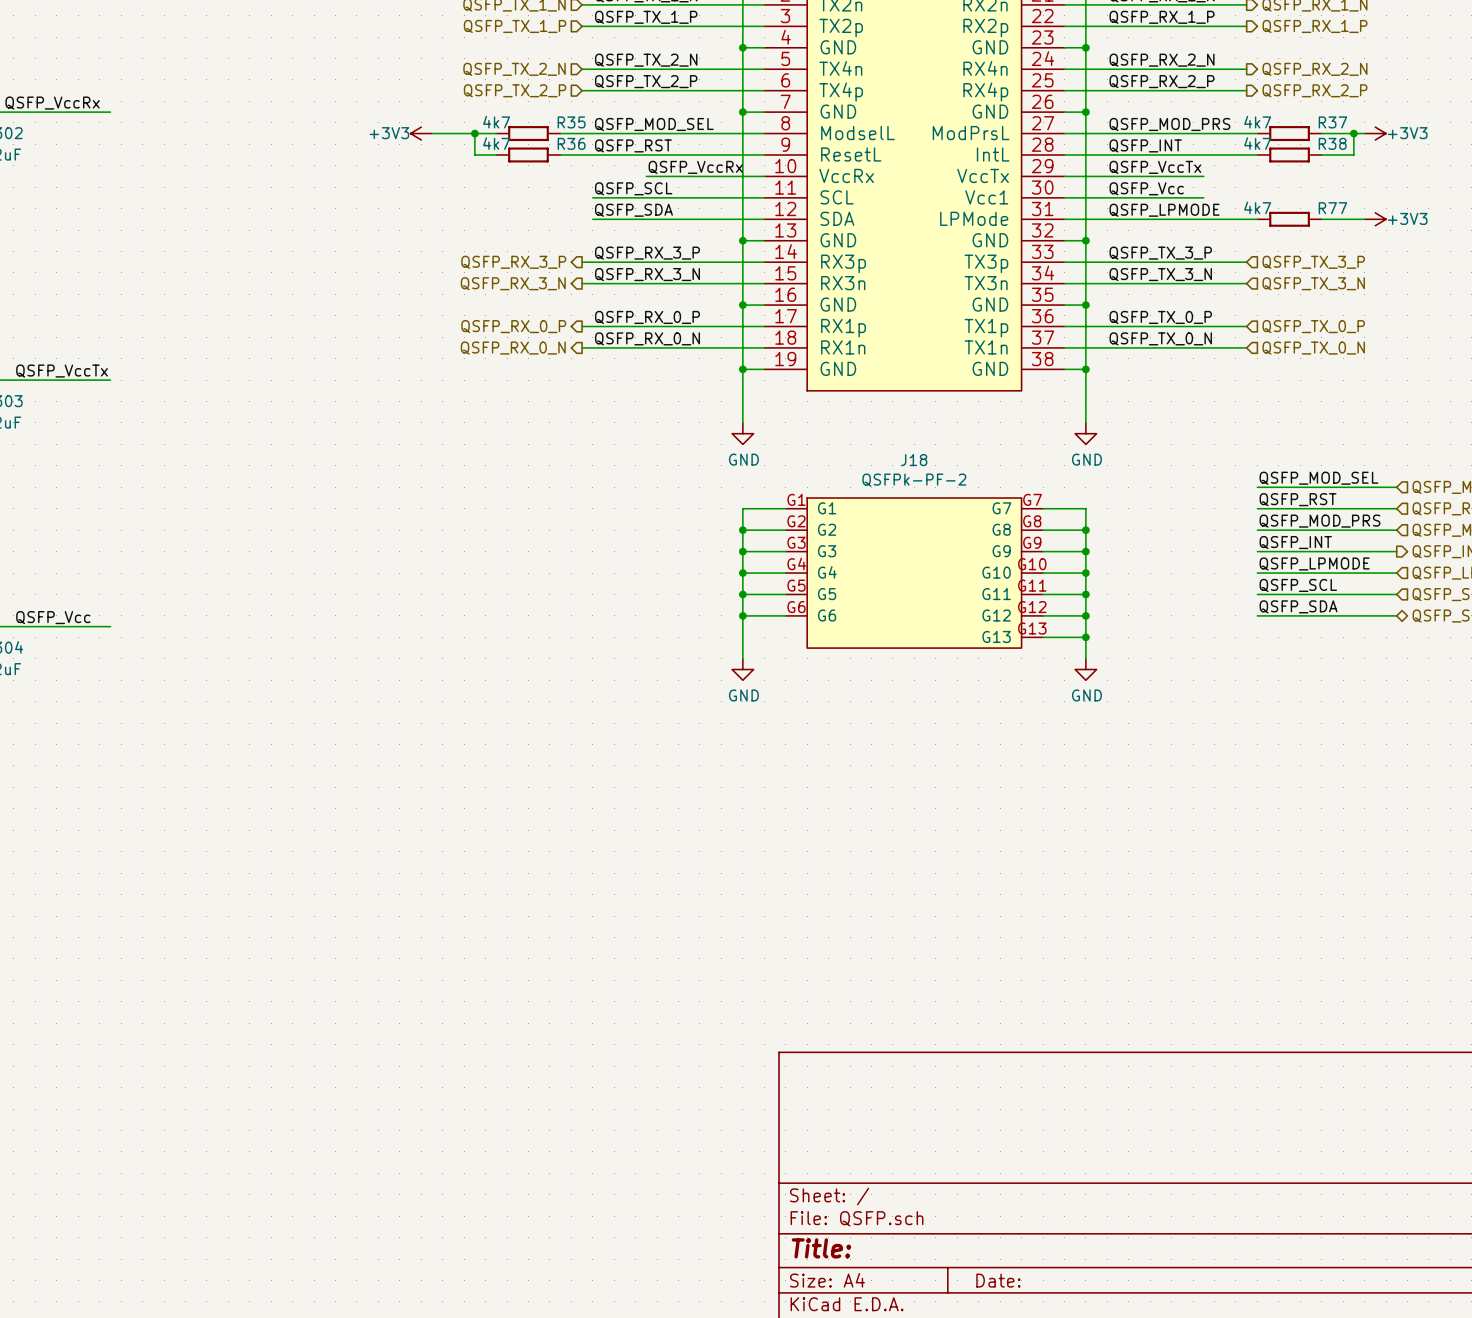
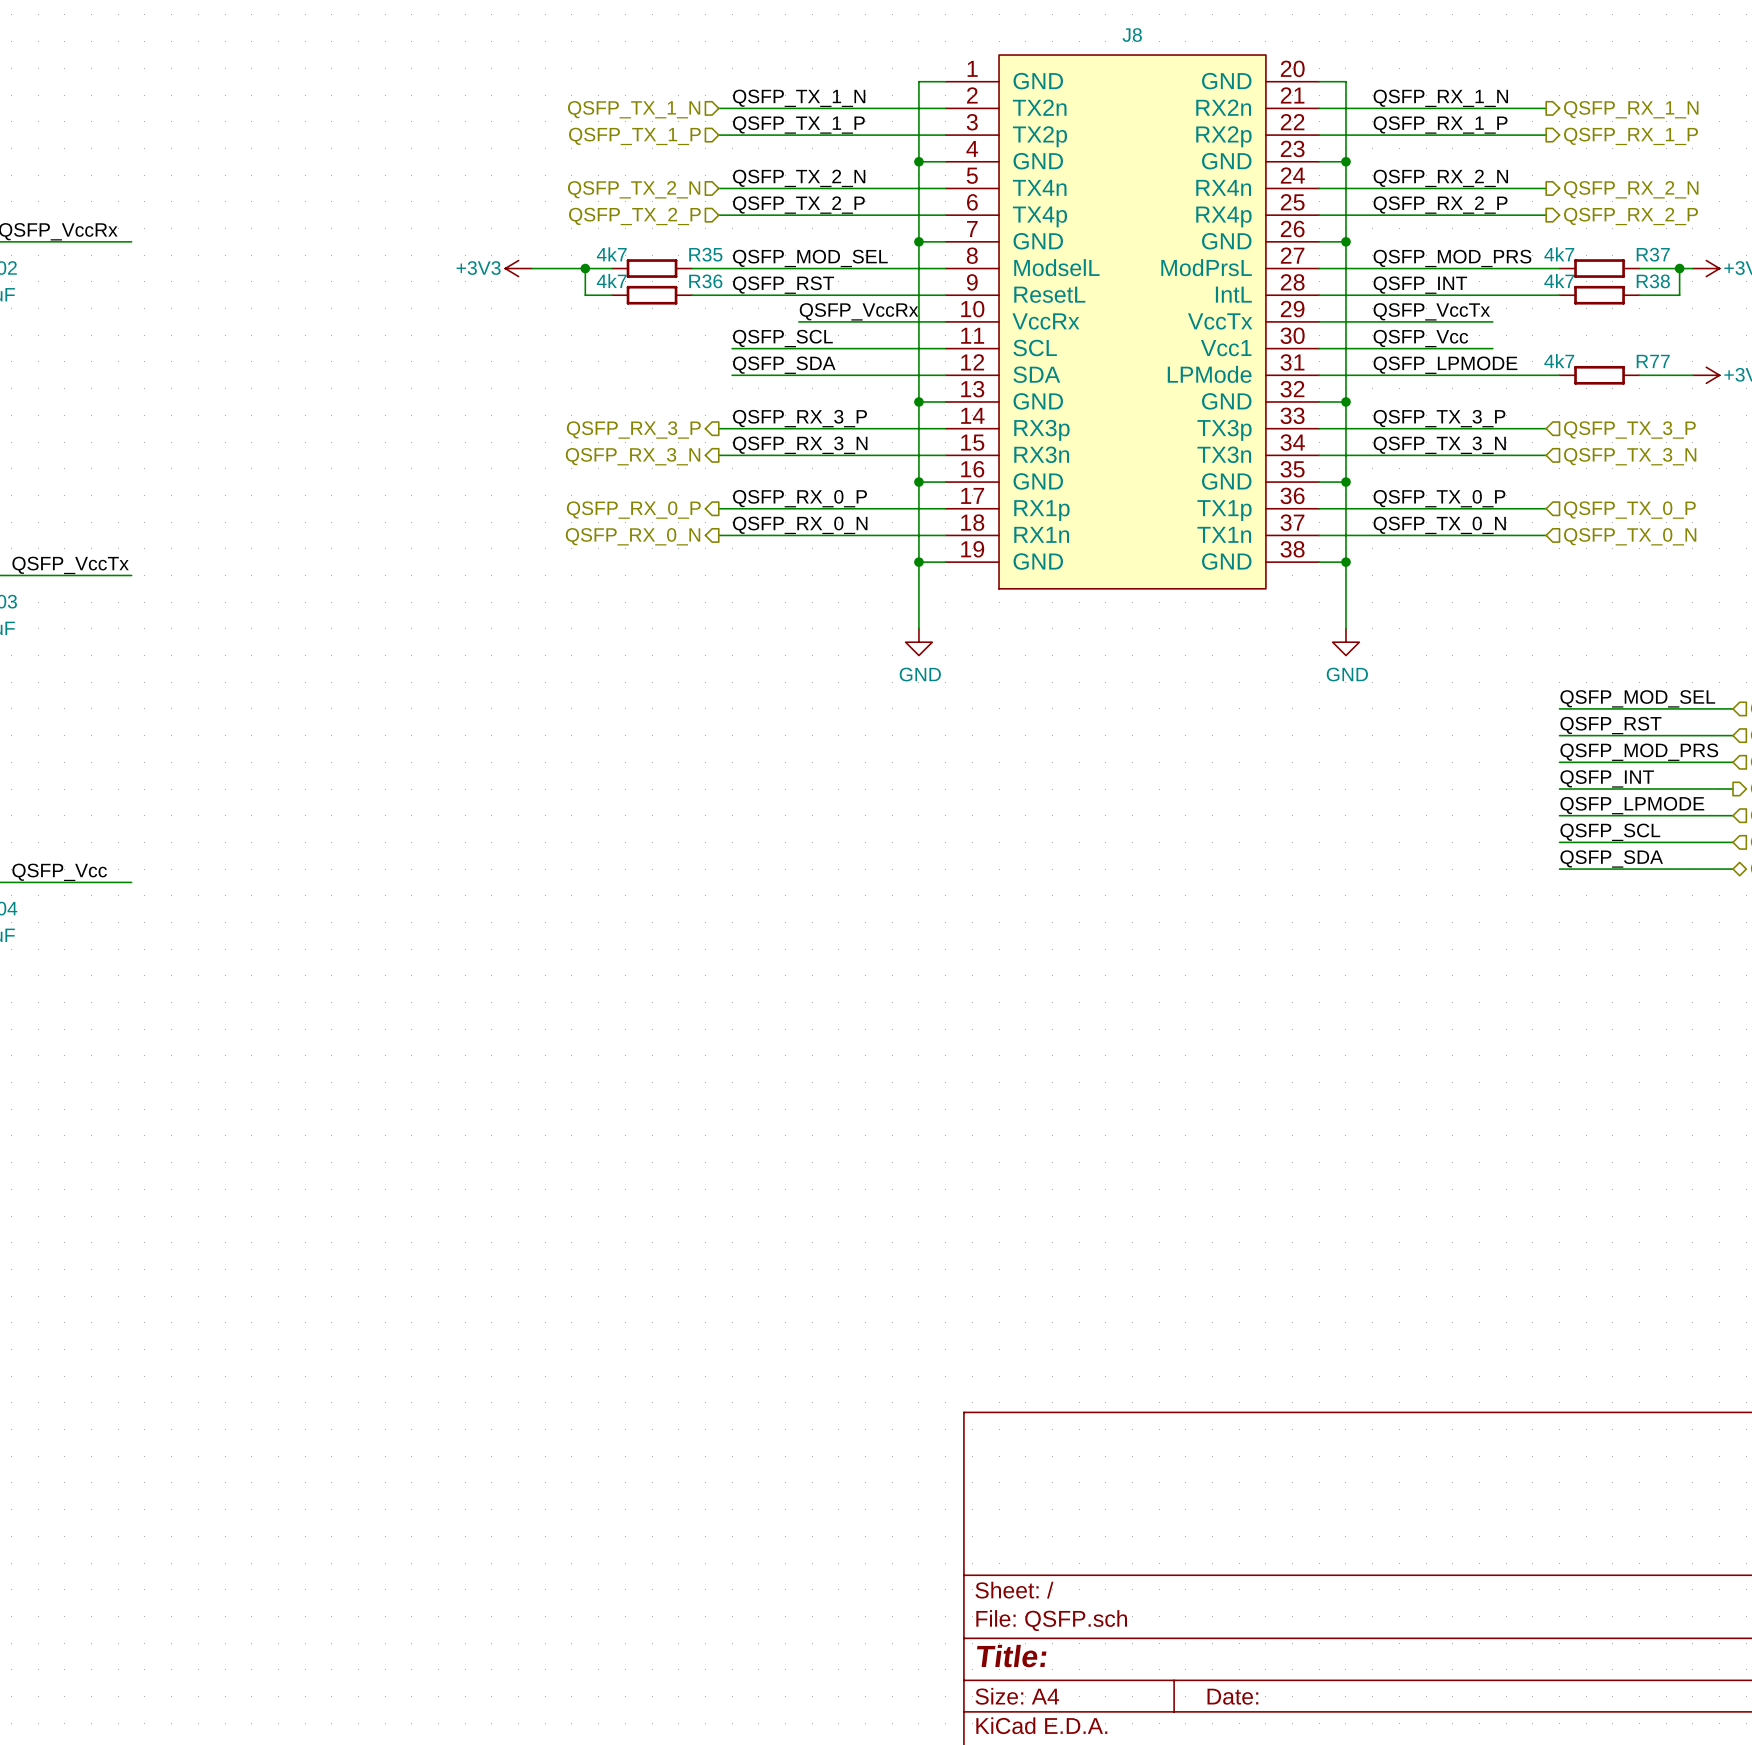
wire: (785, 508) (742, 508) (742, 658) -> none
wire: (1043, 508) (1085, 508) (1085, 658) -> none
wire: (742, 530) (785, 530) -> none
junction: (742, 530) -> none
wire: (1043, 530) (1085, 530) -> none
junction: (1085, 530) -> none
wire: (742, 551) (785, 551) -> none
junction: (742, 551) -> none
wire: (1043, 551) (1085, 551) -> none
junction: (1085, 551) -> none
wire: (742, 573) (785, 573) -> none
junction: (742, 573) -> none
J18: QSFPk-PF-2 (914, 573) -> none
wire: (1043, 573) (1085, 573) -> none
junction: (1085, 573) -> none
wire: (742, 594) (785, 594) -> none
junction: (742, 594) -> none
wire: (1043, 594) (1085, 594) -> none
junction: (1085, 594) -> none
wire: (742, 615) (785, 615) -> none
junction: (742, 615) -> none
wire: (1043, 615) (1085, 615) -> none
junction: (1085, 615) -> none
wire: (1043, 637) (1085, 637) -> none
junction: (1085, 637) -> none
power symbol: GND (742, 669) -> none
power symbol: GND (1085, 669) -> none

